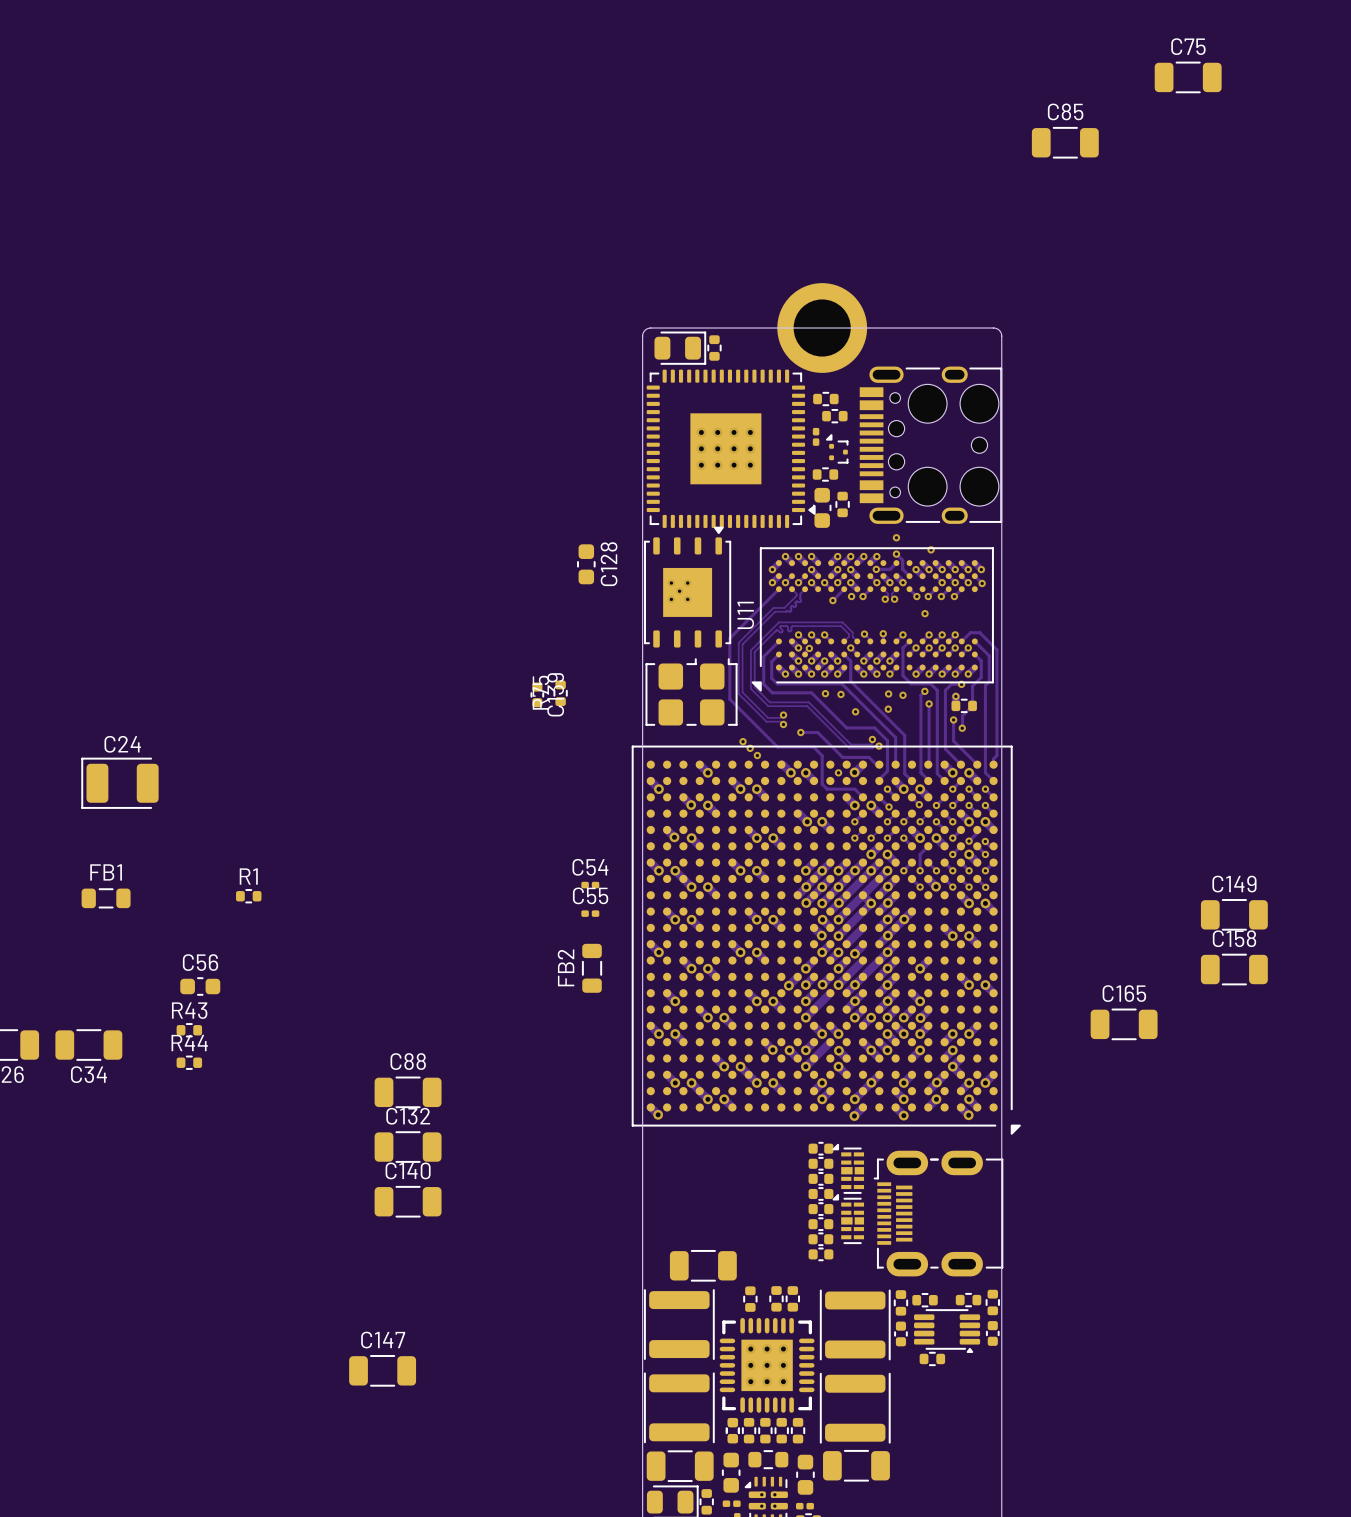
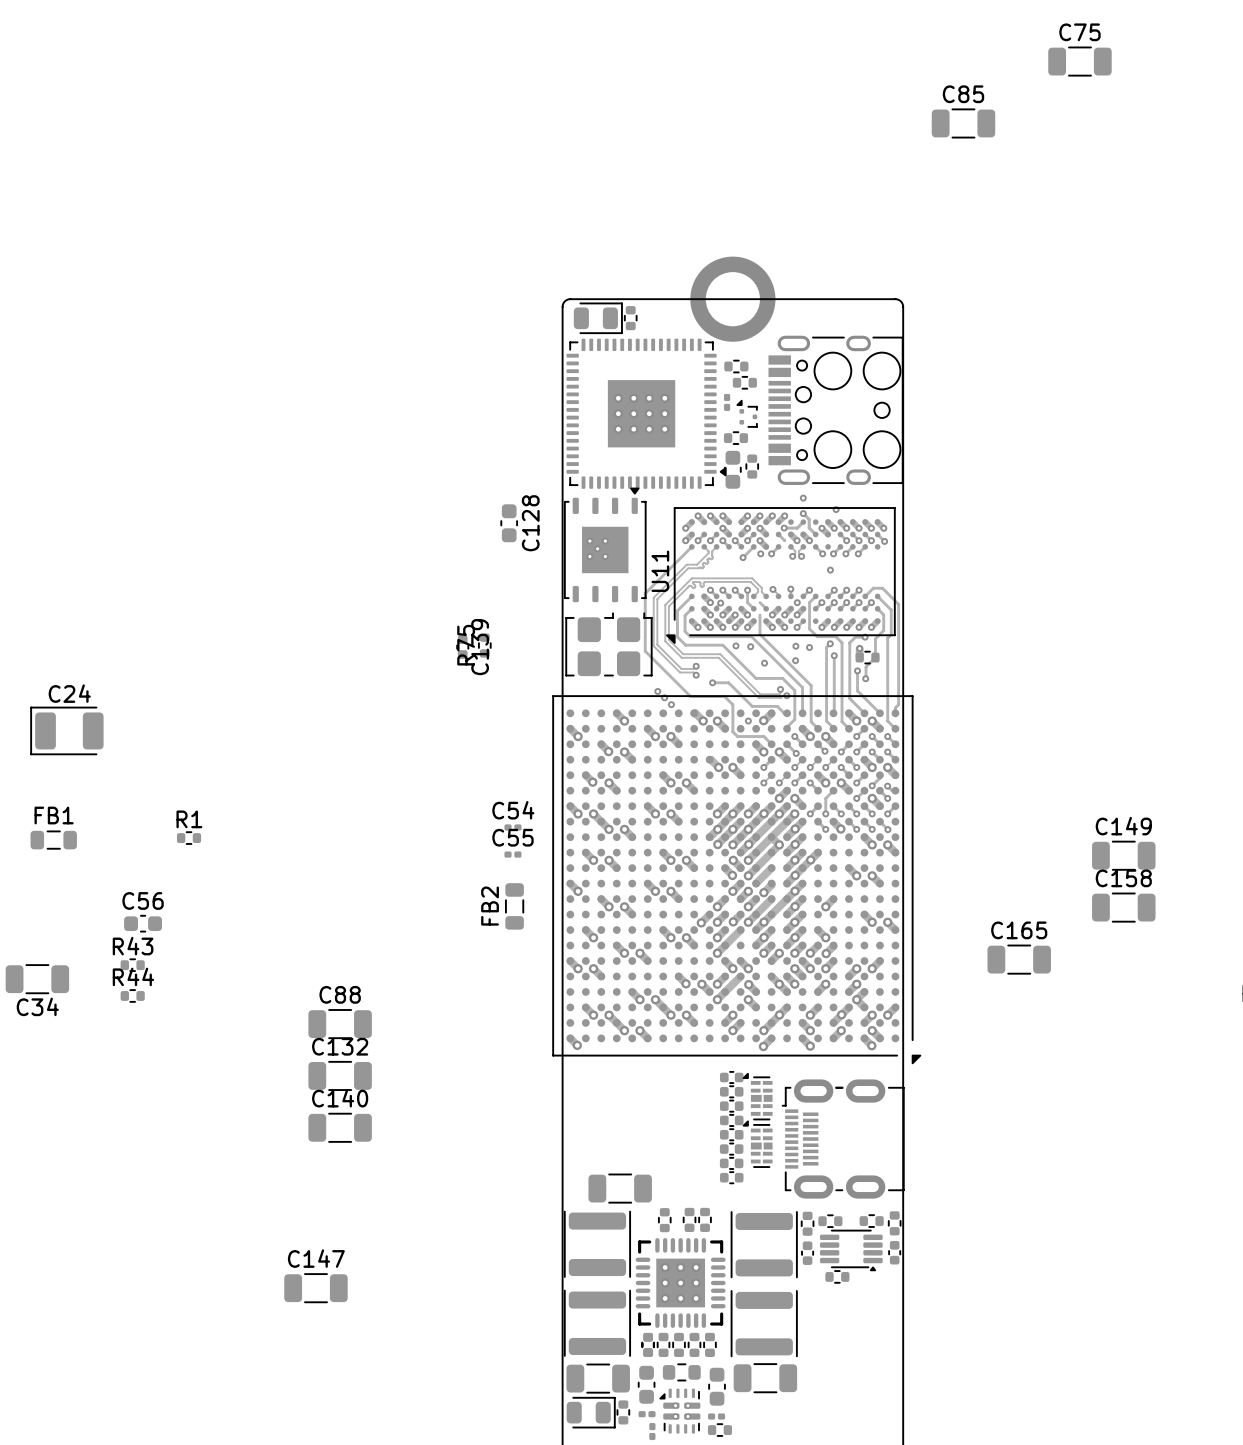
via: (876, 582) -> none
via position: (850, 647) -> (747, 590)
via: none -> (797, 602)
track: (844, 654) (850, 661) -> (753, 608) (747, 602) (747, 590)

